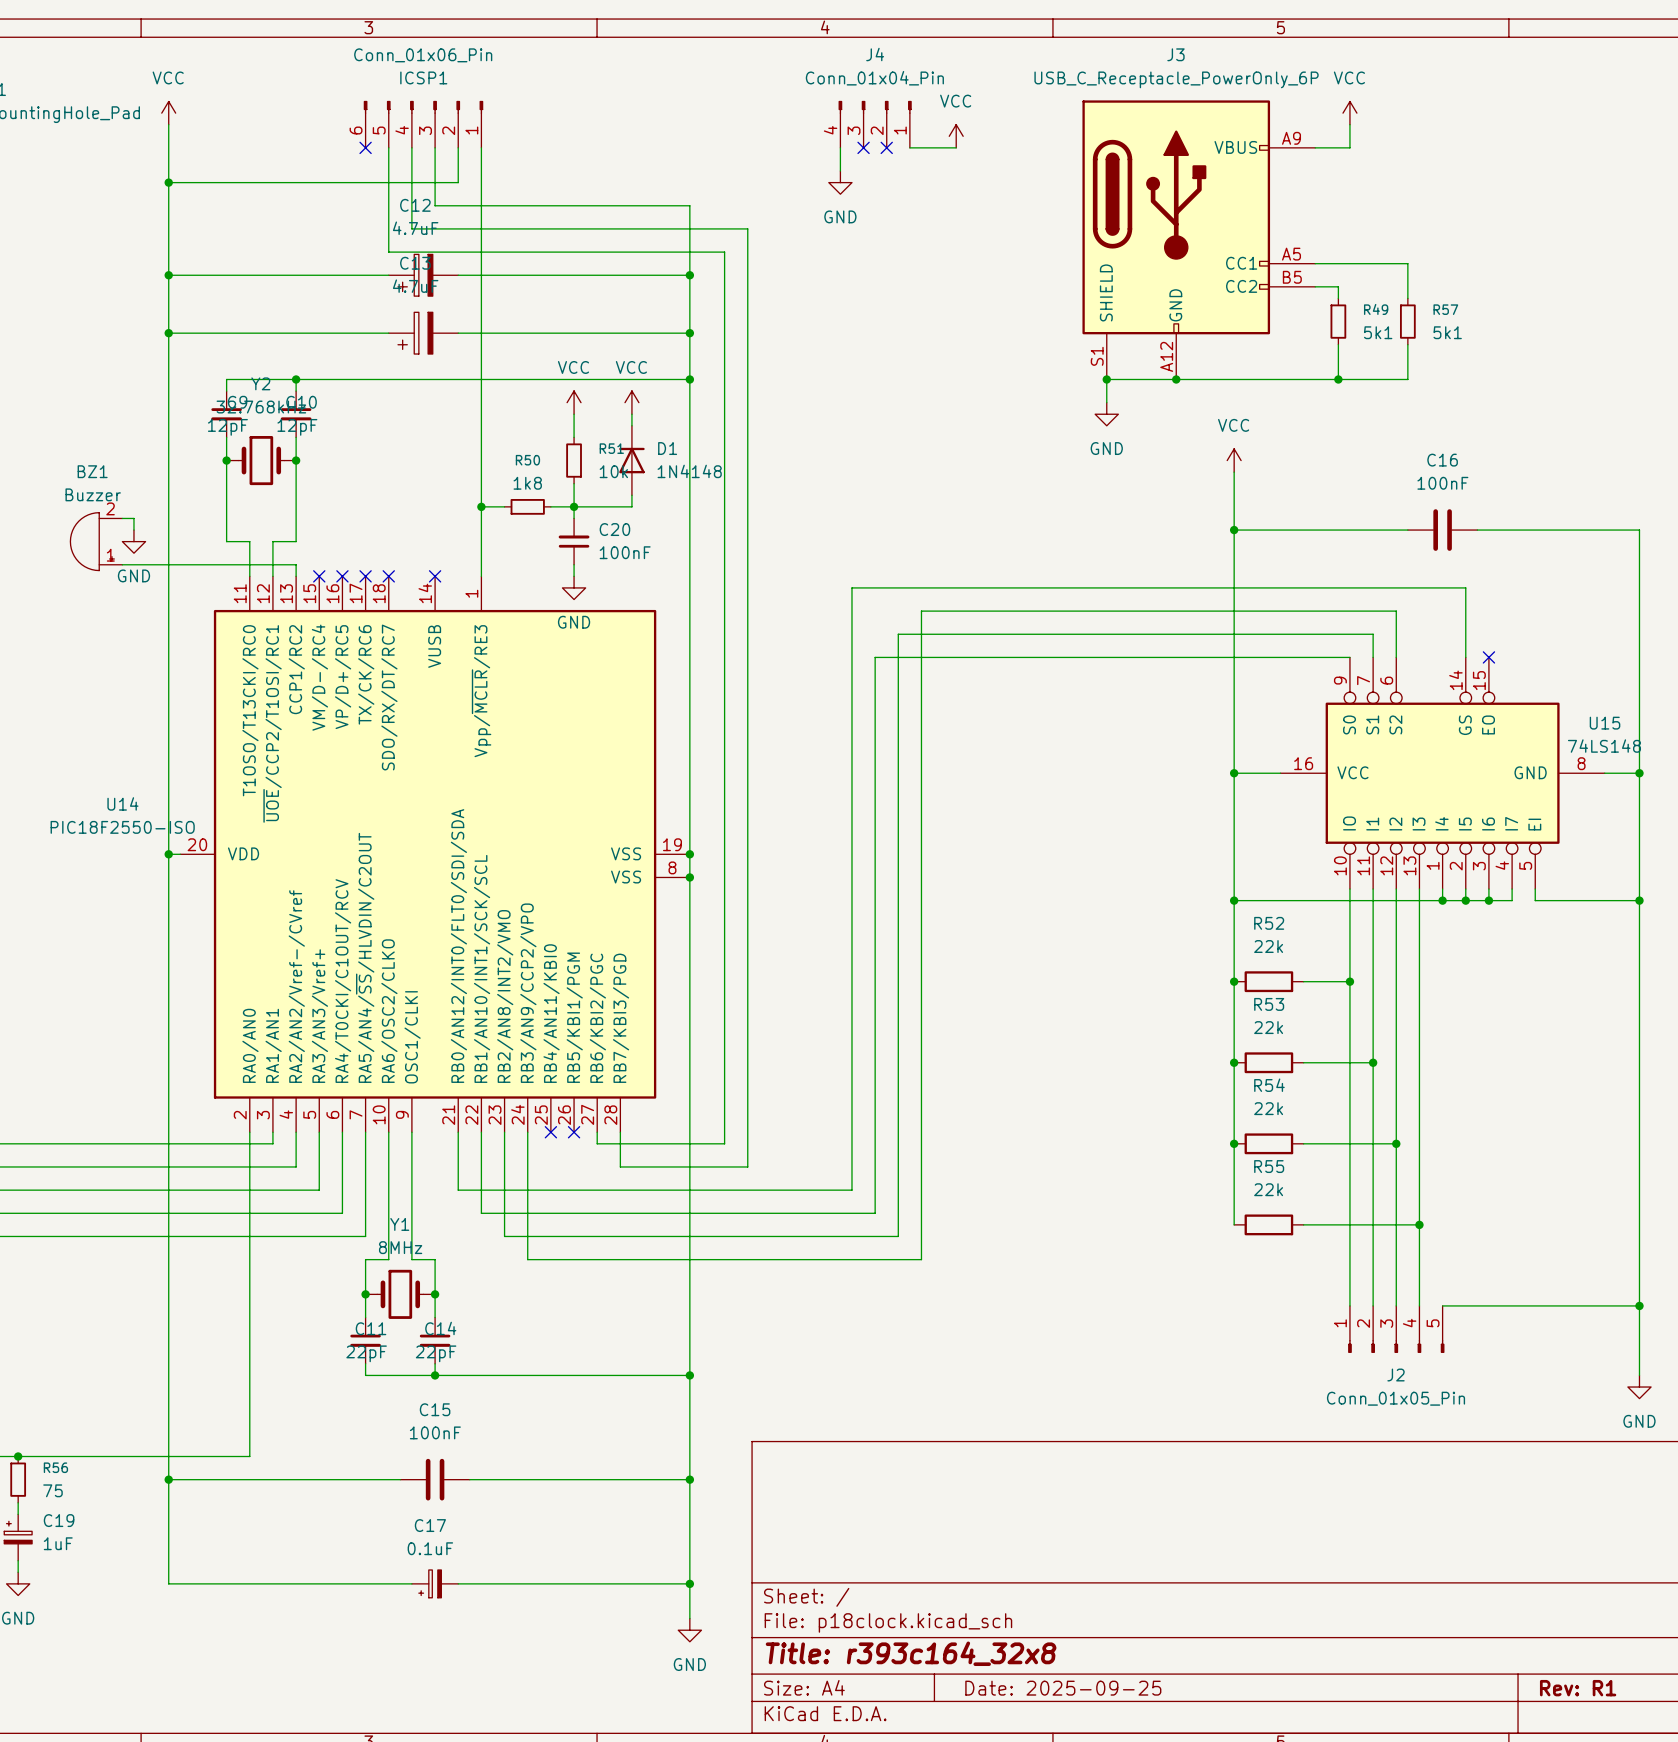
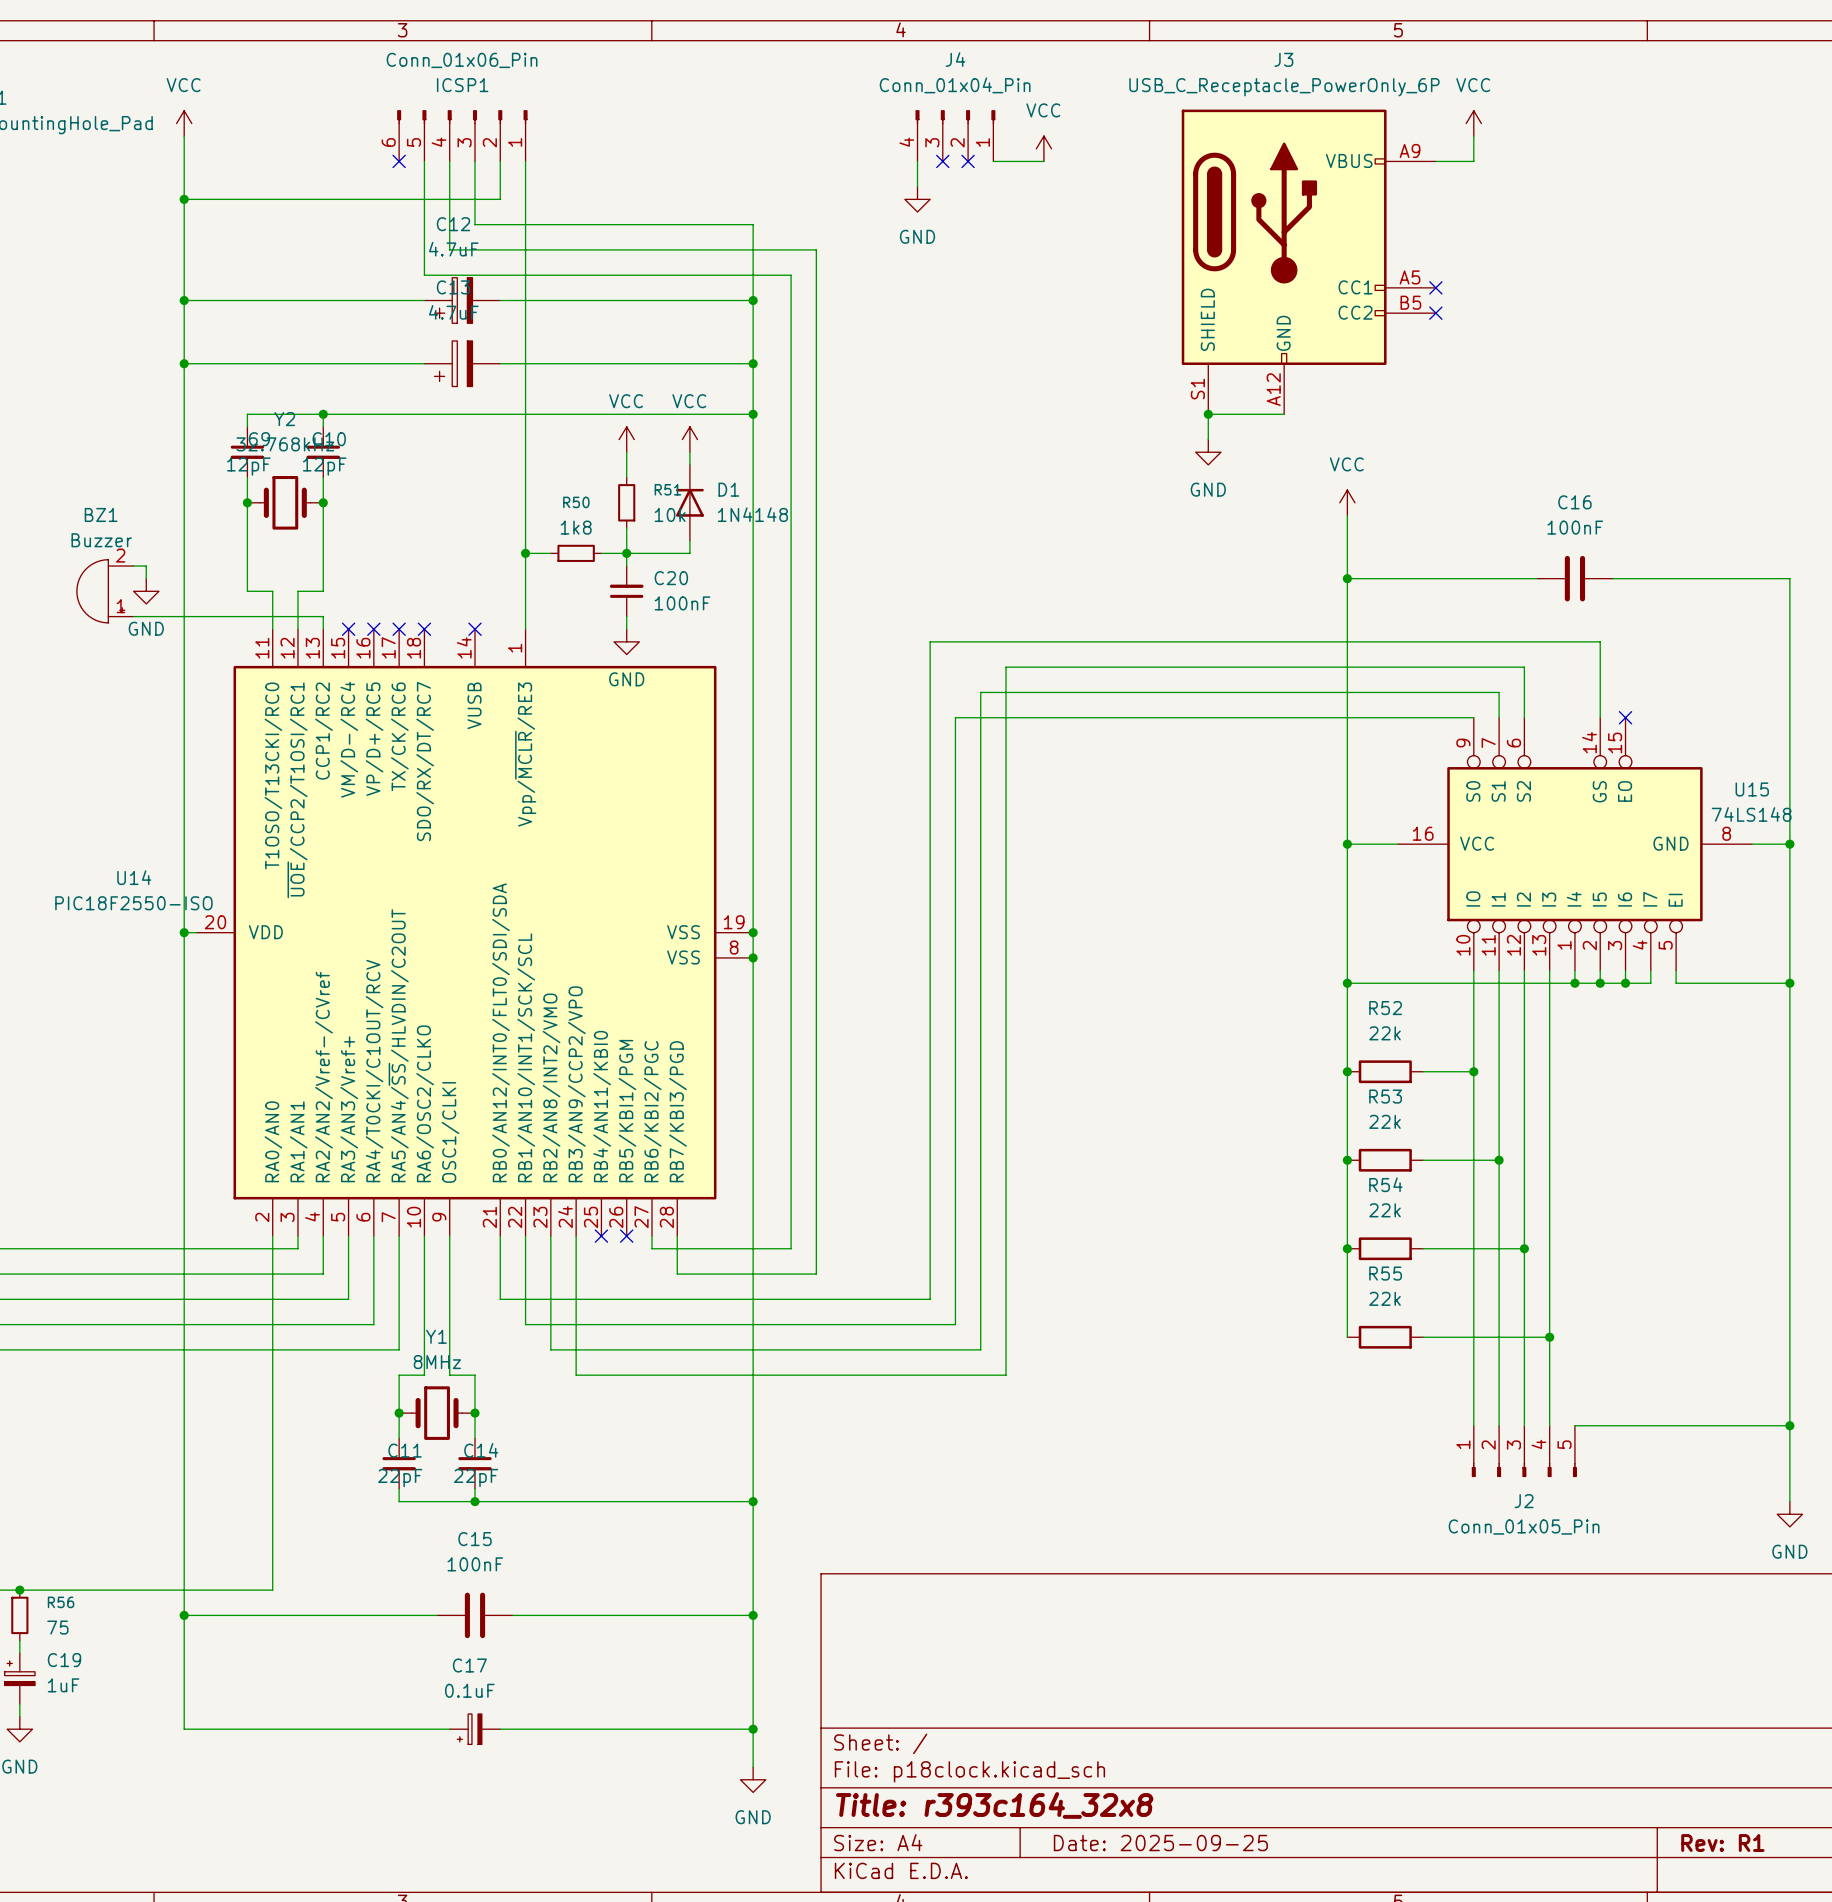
wire: (1315, 263) (1407, 263) (1407, 298) -> none
no-connect mark: none -> (1435, 287)
wire: (1315, 286) (1338, 286) (1338, 298) -> none
no-connect mark: none -> (1435, 313)
R49: 5k1 (1338, 321) -> none
R57: 5k1 (1407, 321) -> none
wire: (1338, 344) (1338, 379) -> none
wire: (1407, 344) (1407, 379) (1176, 379) -> none
junction: (1176, 379) -> none
junction: (1338, 379) -> none

